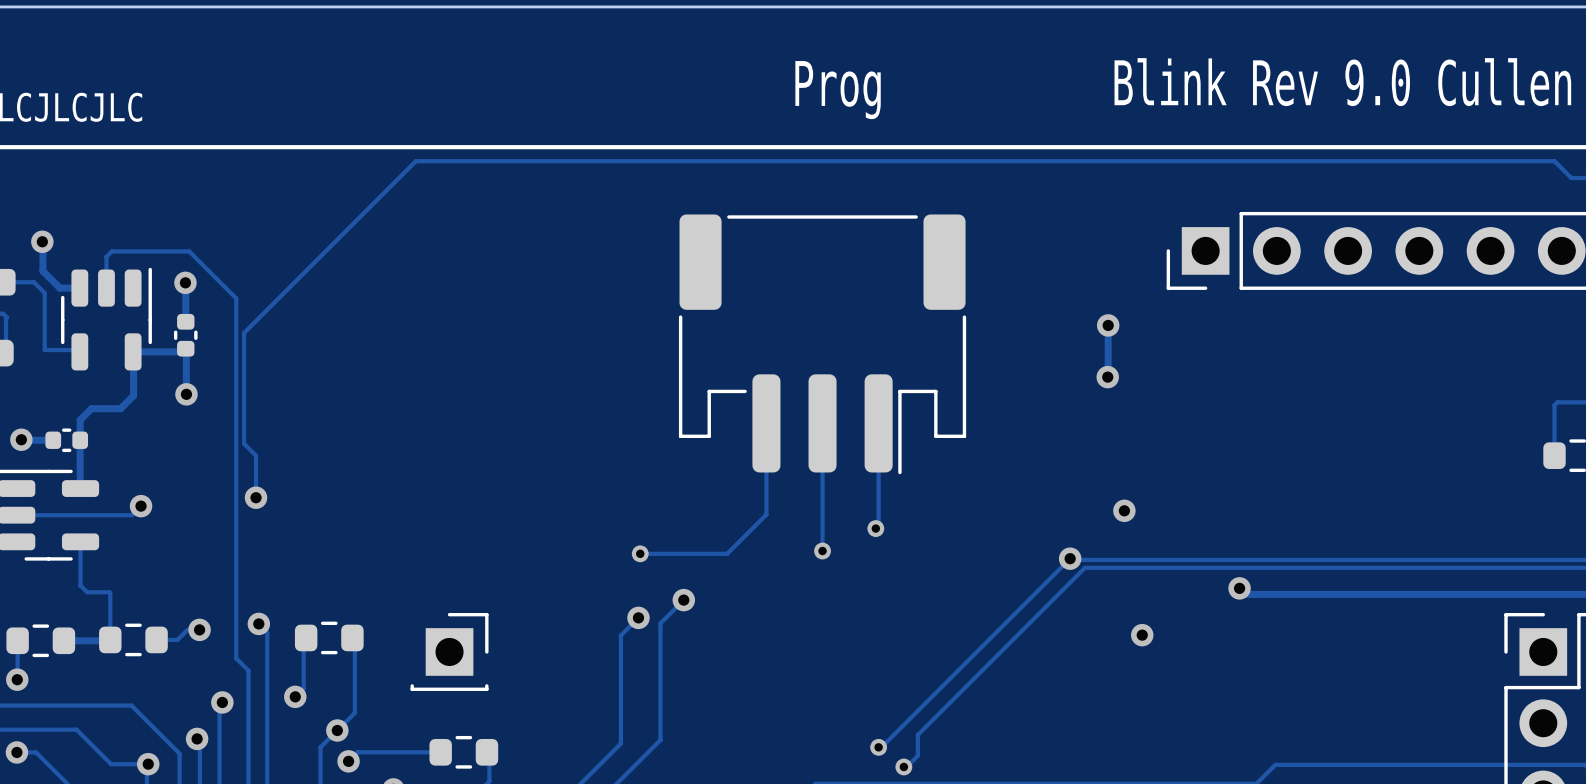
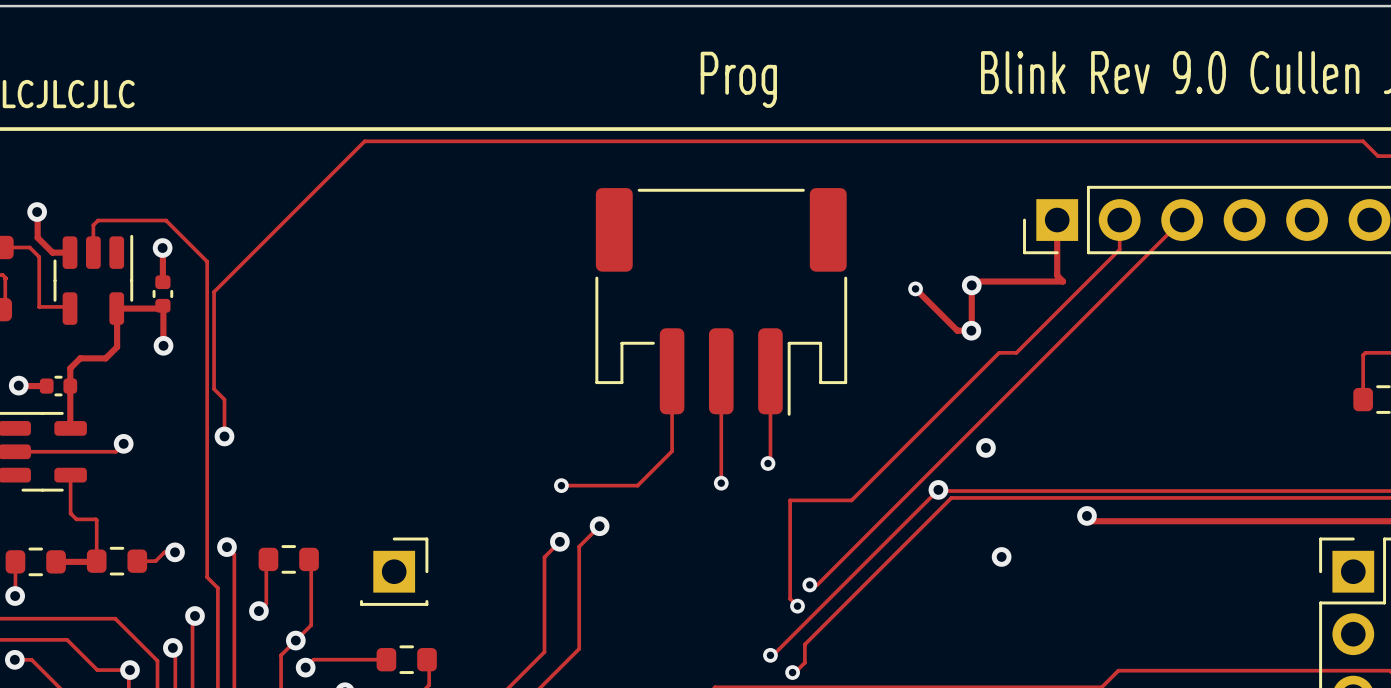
track: none -> (1057, 220) (1057, 275) (1063, 281) (975, 281) (971, 285)
track: none -> (1119, 220) (1119, 249) (1016, 352) (999, 352) (851, 500) (790, 500) (790, 598) (797, 606)
track: none -> (1182, 220) (817, 584) (809, 584)
track: none -> (915, 288) (957, 330) (971, 330)
via: none -> (915, 288)
via: none -> (809, 584)
via: none -> (797, 606)

